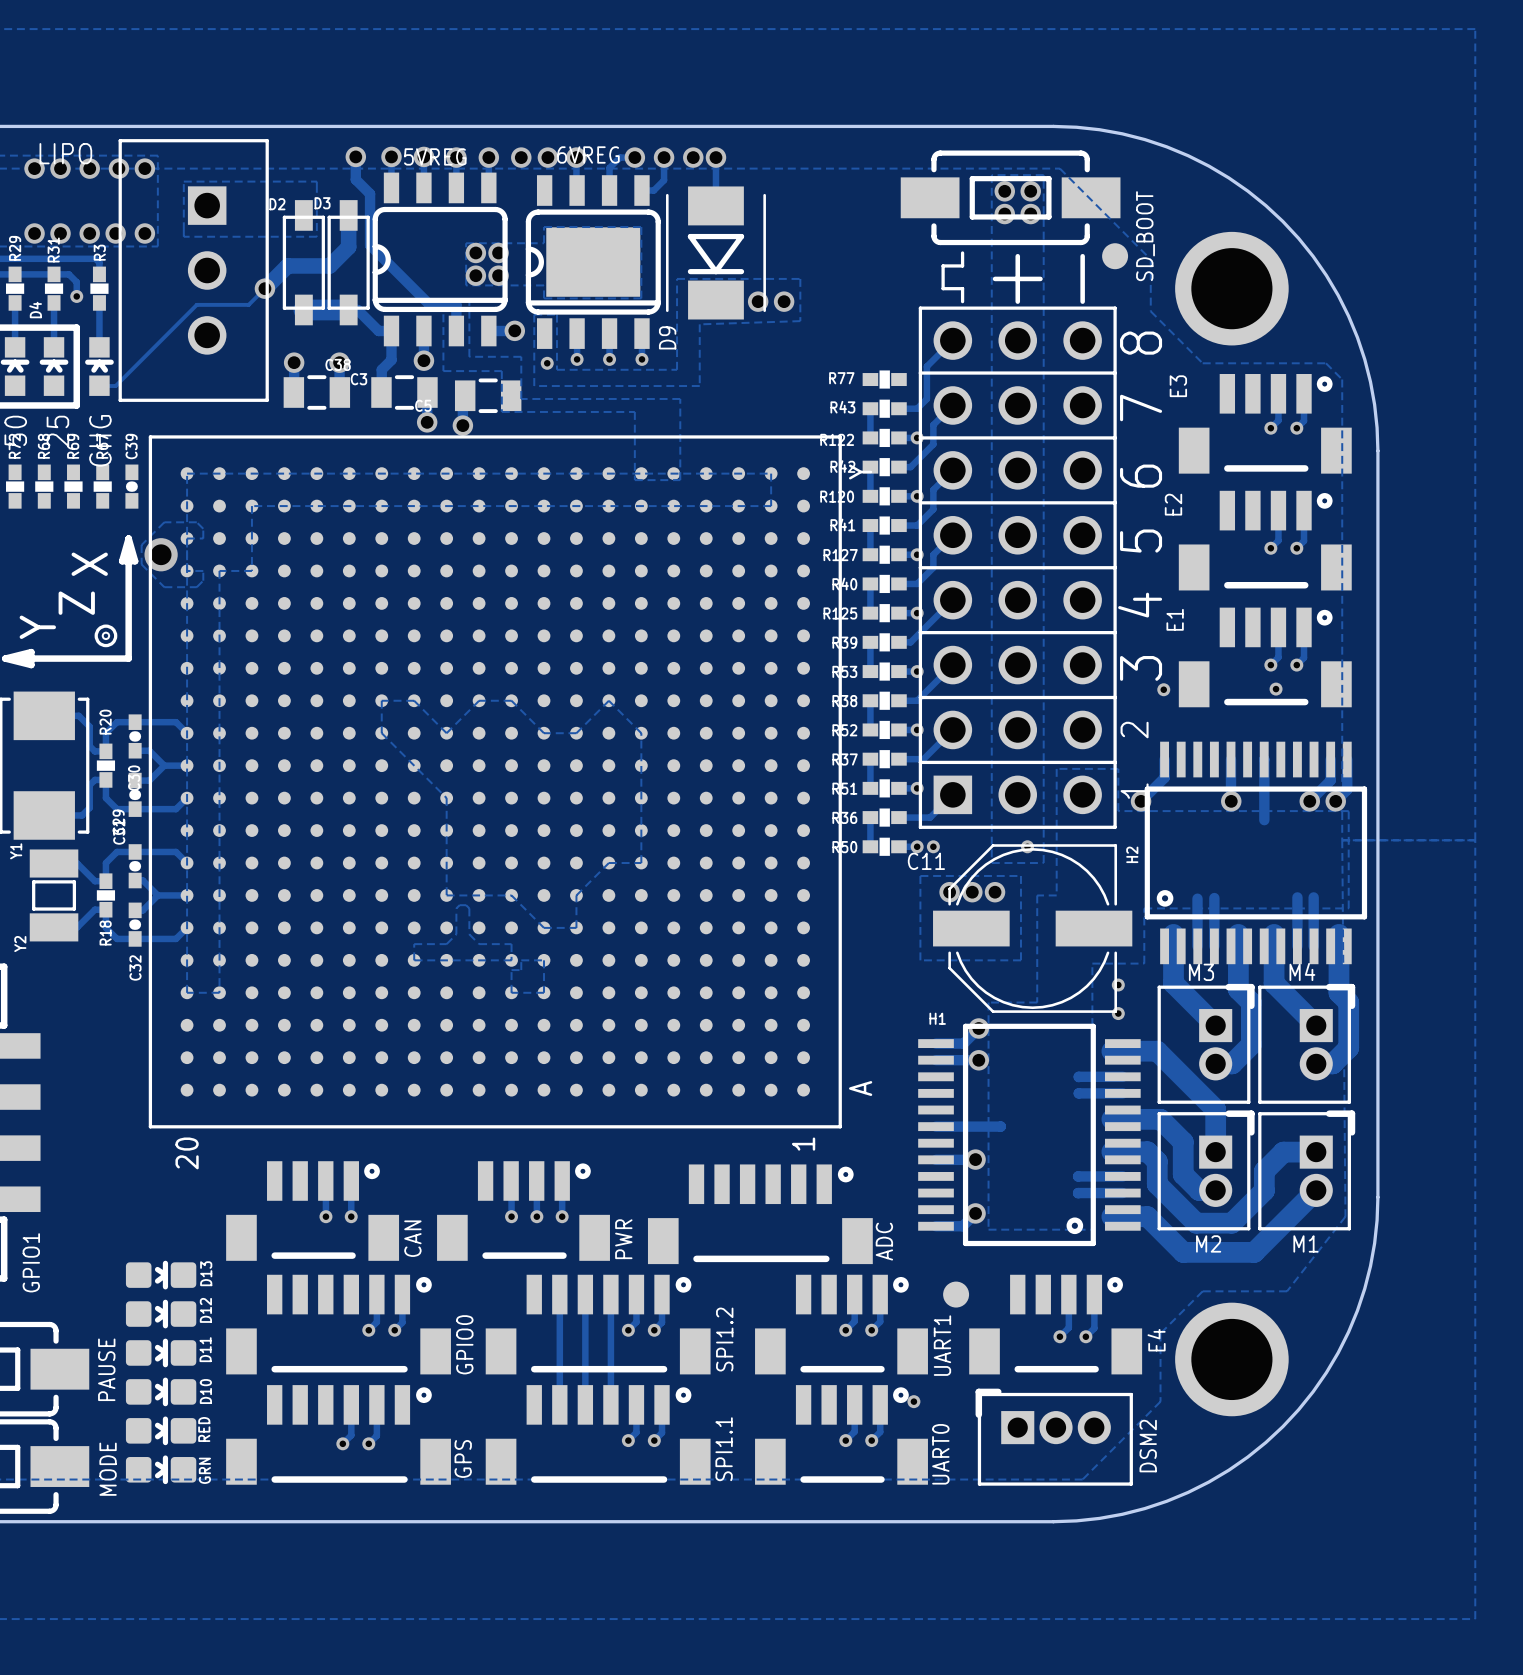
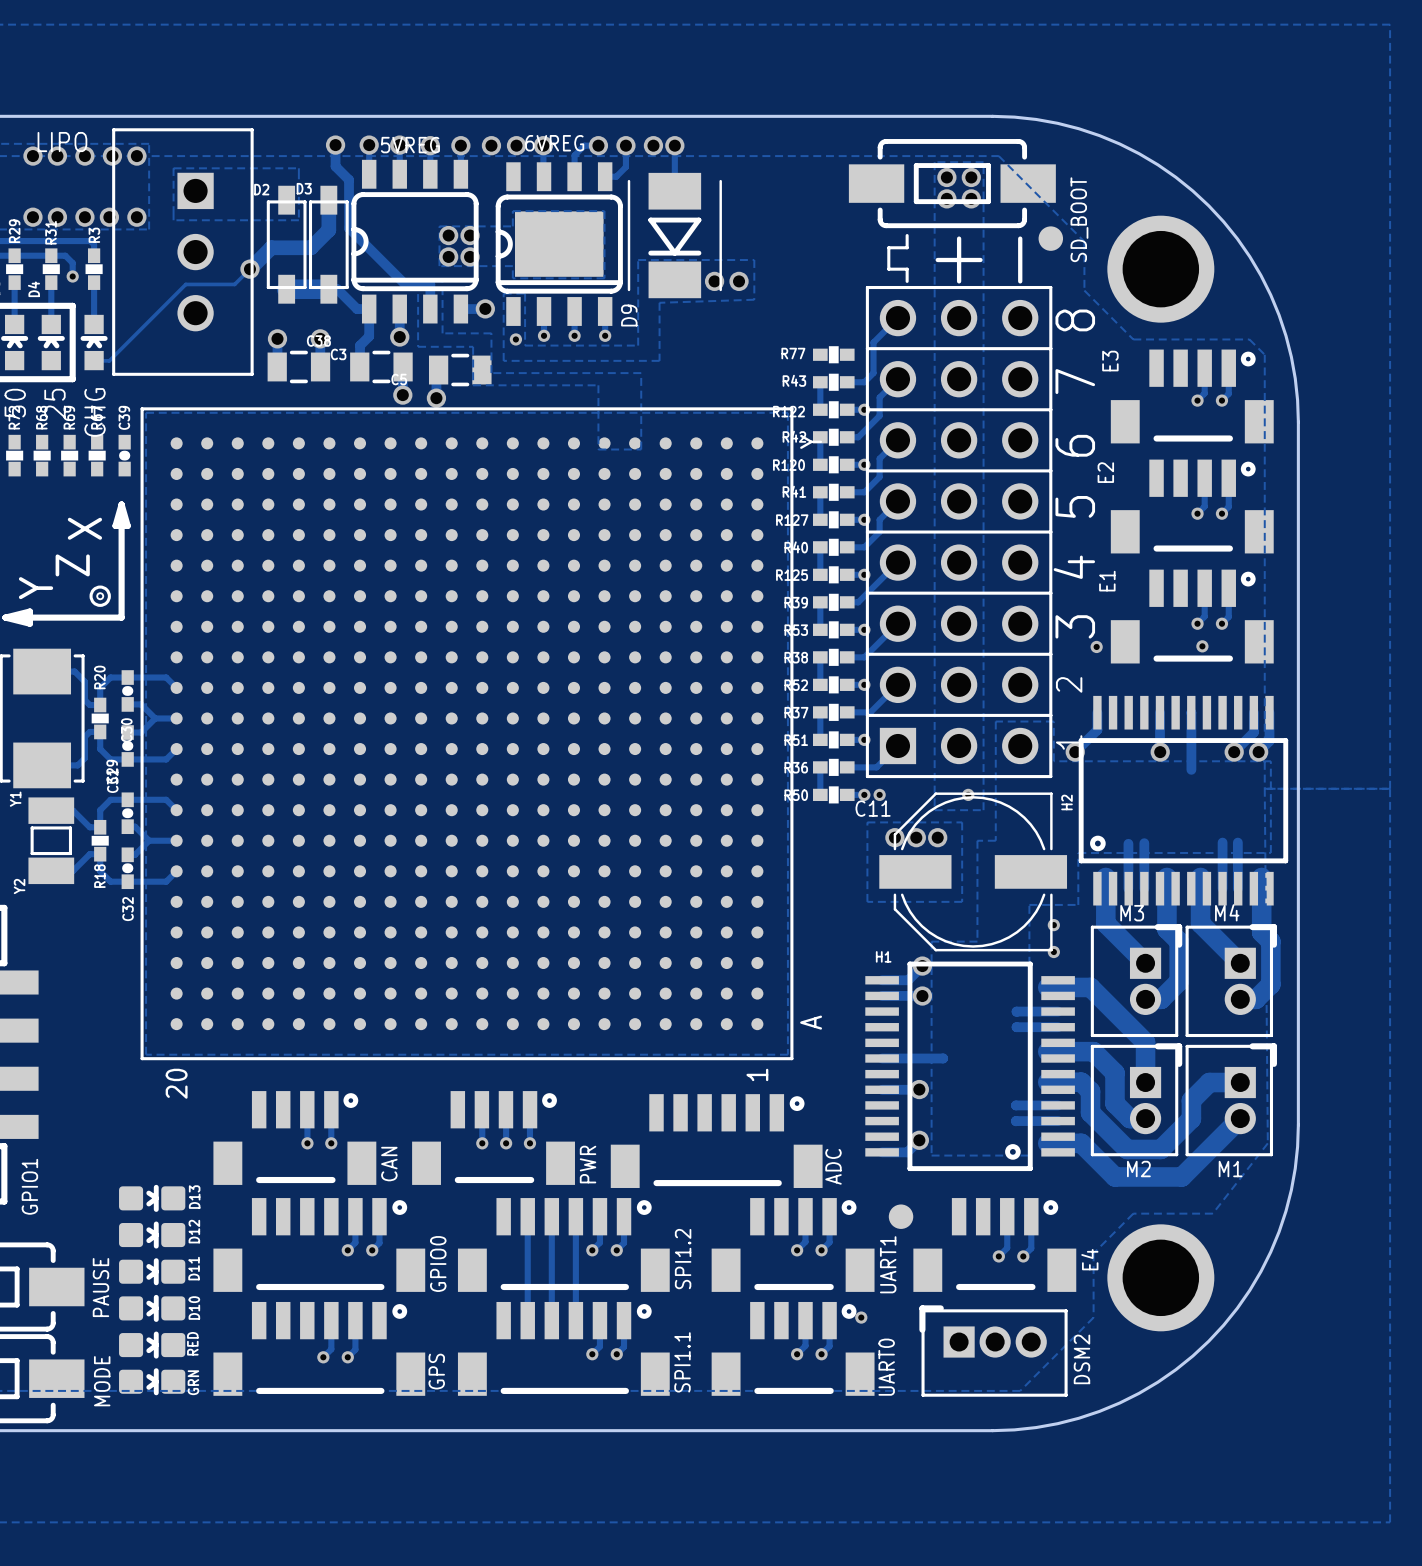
zone outline: (187, 473) (187, 992) (219, 992) (219, 570) (251, 570) (251, 506) (771, 506) (771, 473) (187, 473) -> (146, 412) (146, 1054) (787, 1054) (787, 412) (146, 412)
zone outline: (187, 538) (203, 538) (203, 528) (196, 522) (164, 522) (141, 545) (141, 564) (164, 587) (196, 587) (203, 580) (203, 570) (187, 570) -> none
via: (161, 554) -> none
zone outline: (381, 700) (381, 733) (446, 798) (446, 895) (511, 895) (544, 927) (576, 927) (576, 895) (608, 863) (641, 863) (641, 733) (608, 700) (576, 733) (544, 733) (511, 700) (479, 700) (446, 733) (414, 700) (381, 700) -> none
zone outline: (459, 905) (456, 908) (456, 934) (446, 944) (414, 944) (414, 960) (511, 960) (511, 944) (479, 944) (469, 934) (469, 908) (466, 905) (459, 905) -> none
zone outline: (521, 960) (521, 970) (511, 970) (511, 992) (544, 992) (544, 960) (521, 960) -> none

